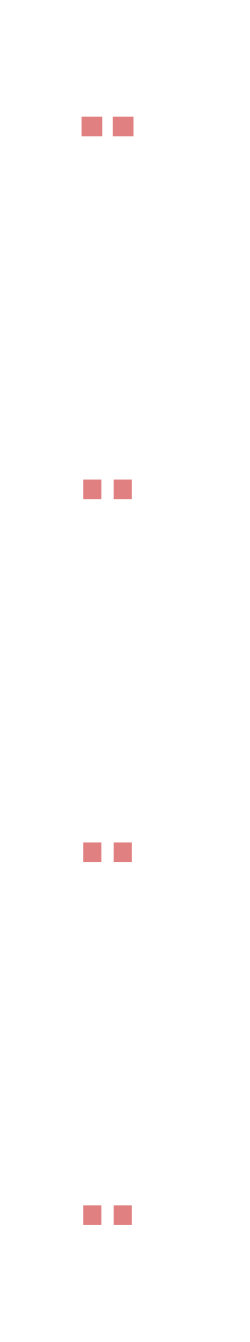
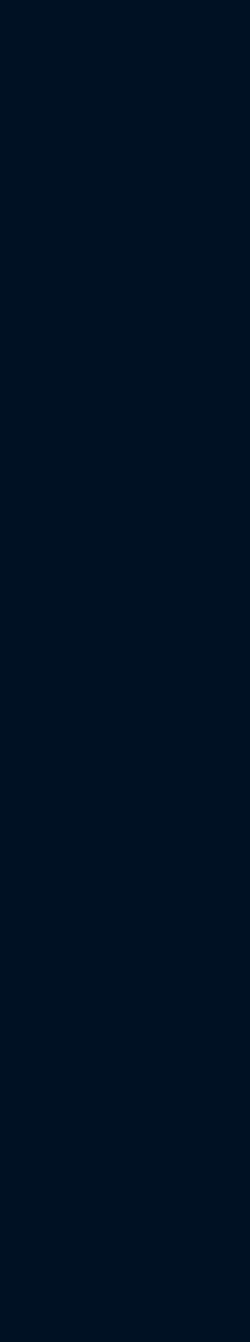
part: (107, 126) -> none
part: (107, 489) -> none
part: (107, 852) -> none
part: (107, 1215) -> none

